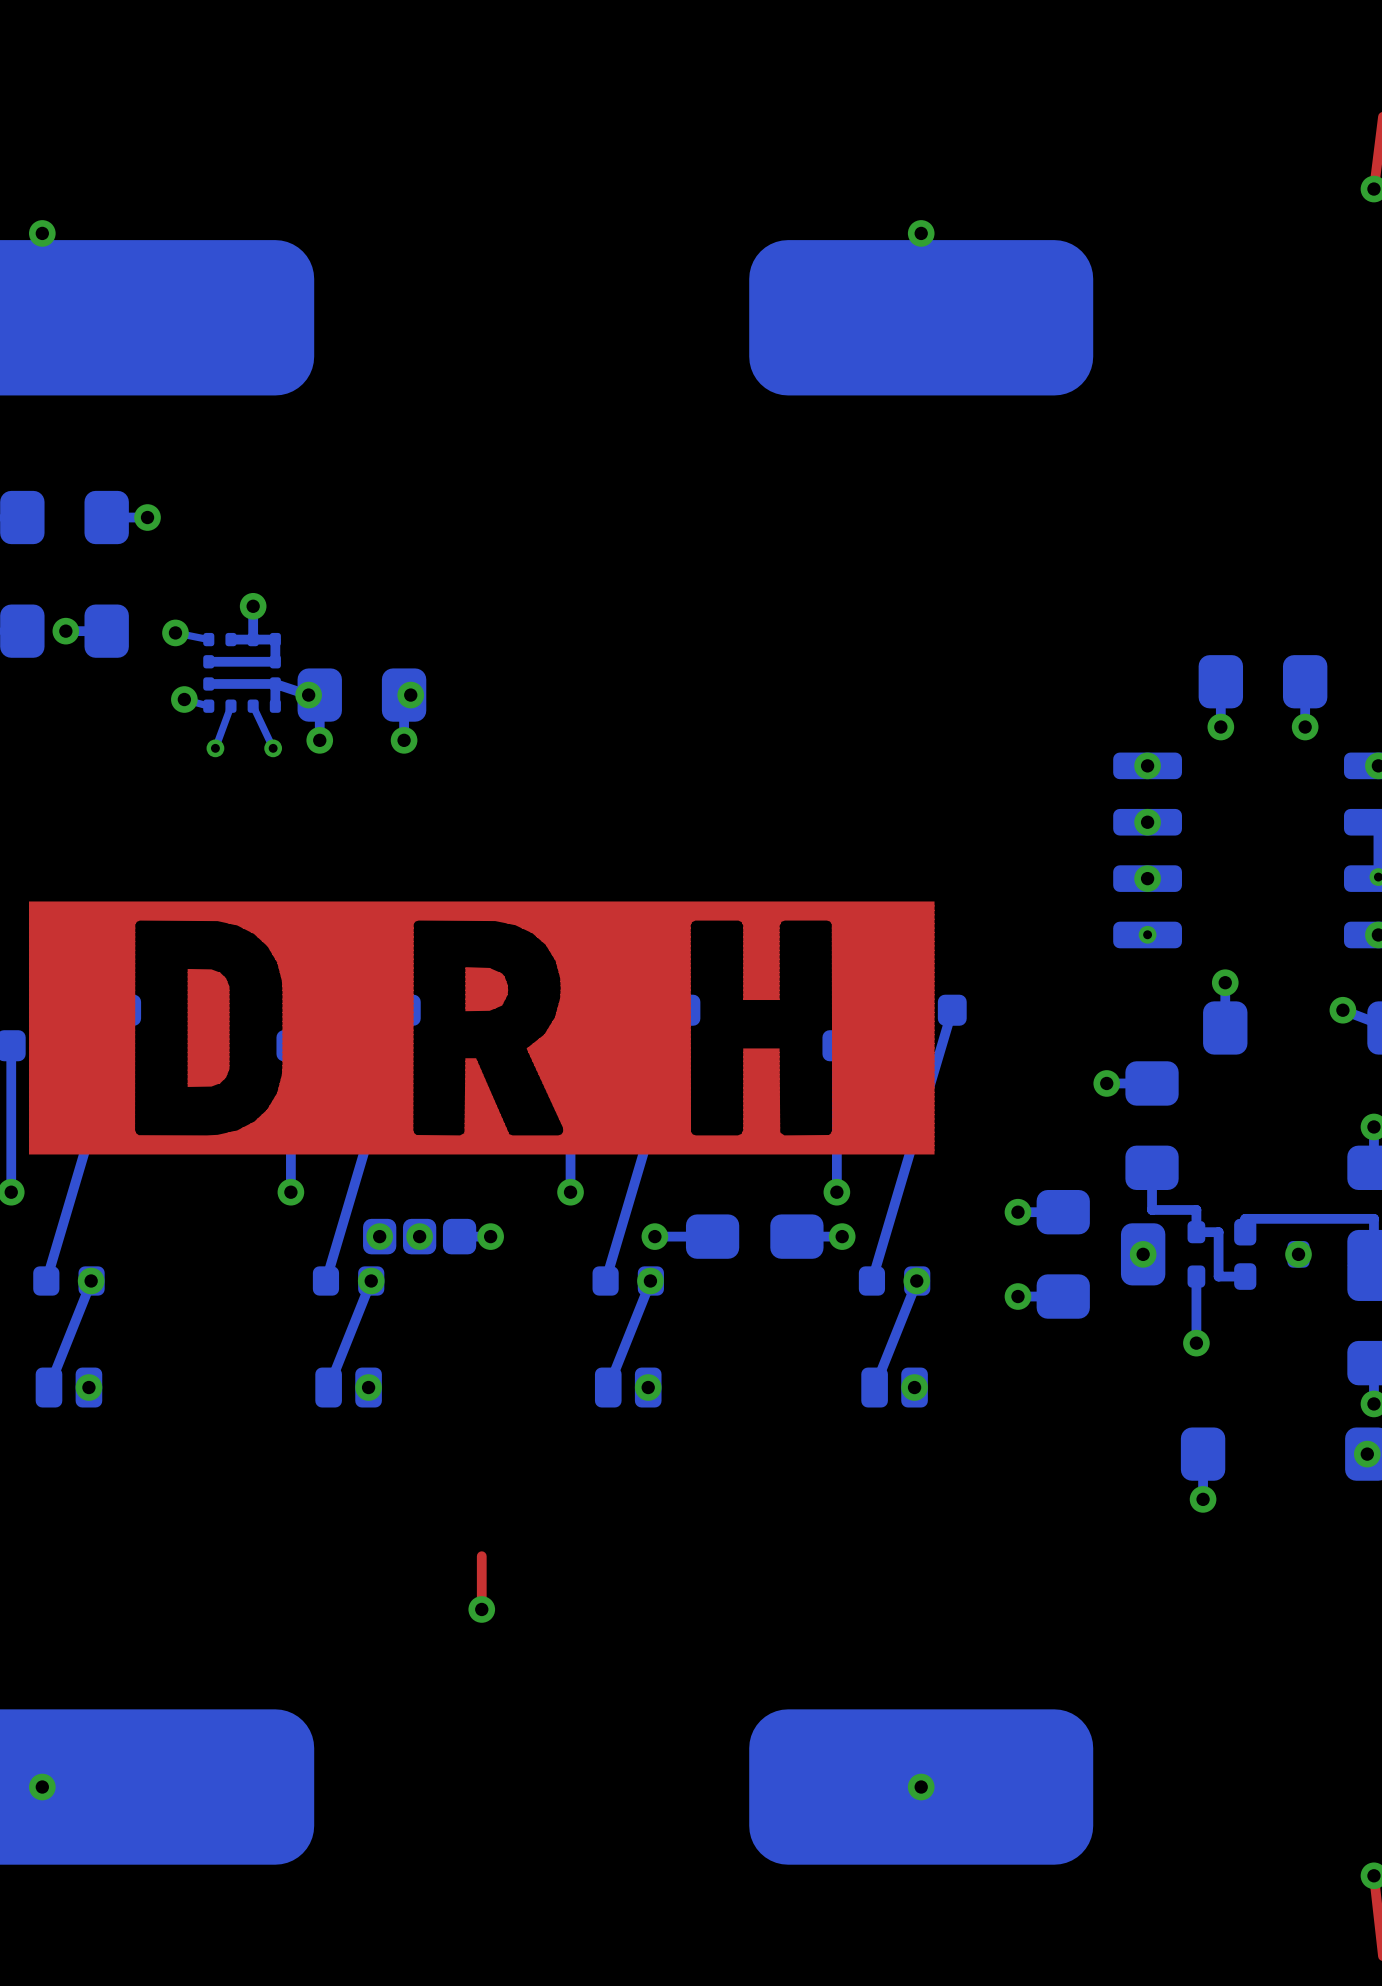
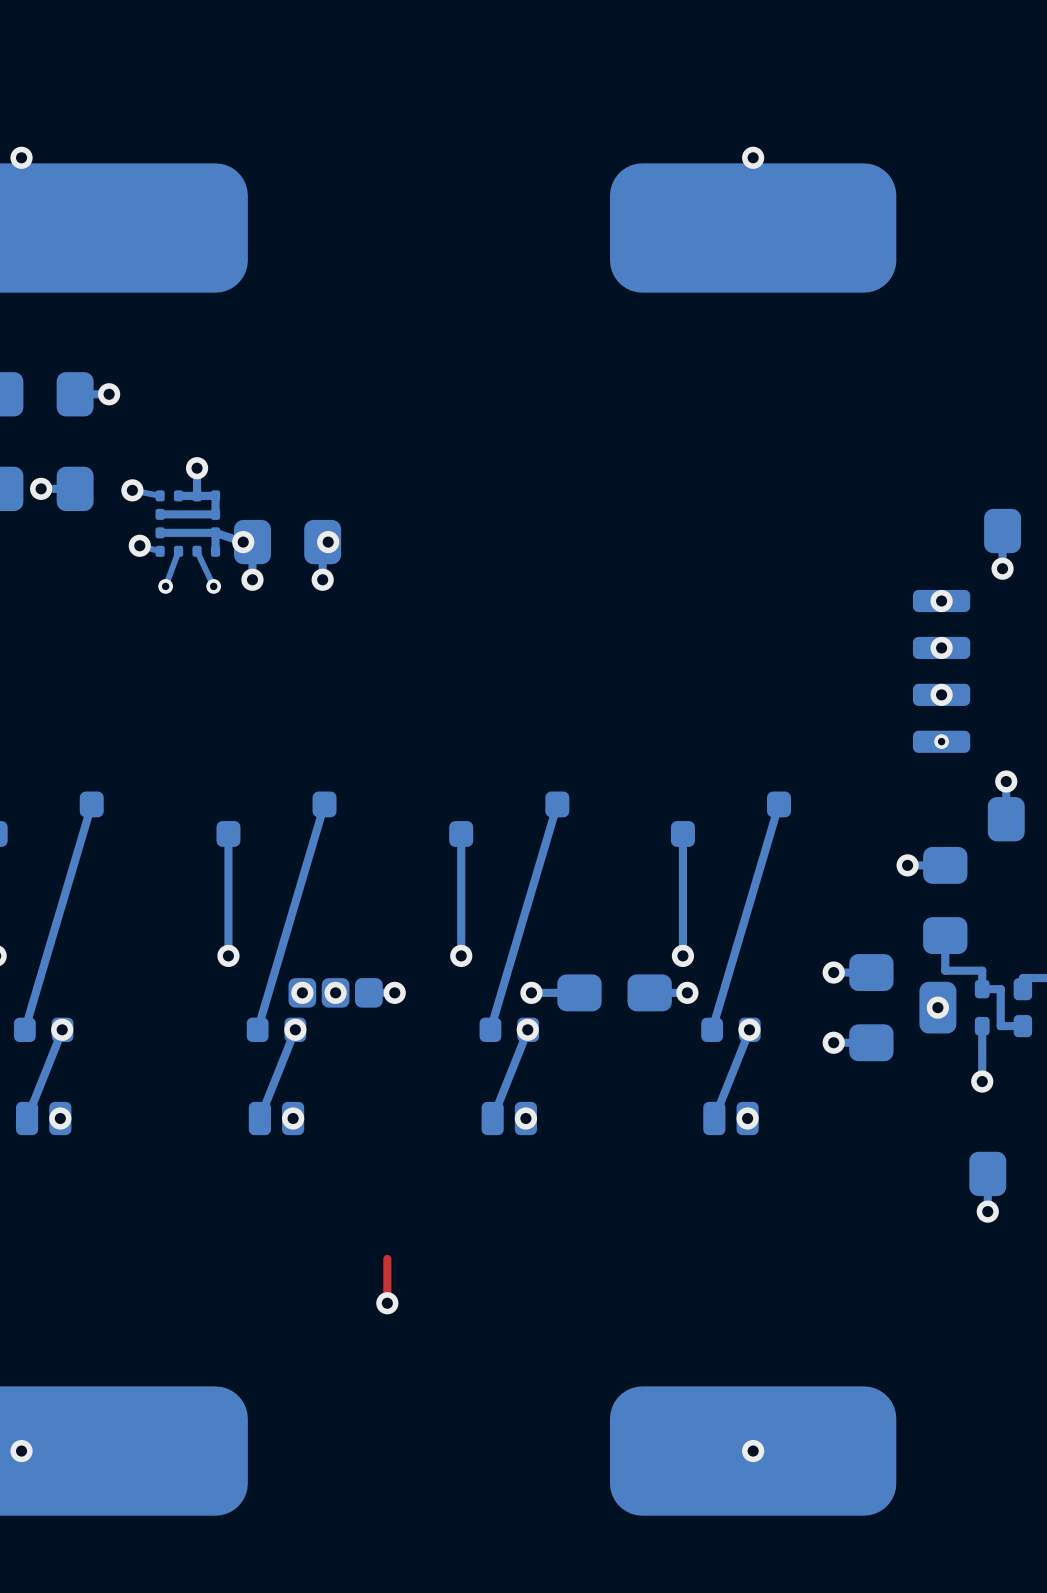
drawing: [29, 901, 935, 1155] -> none

